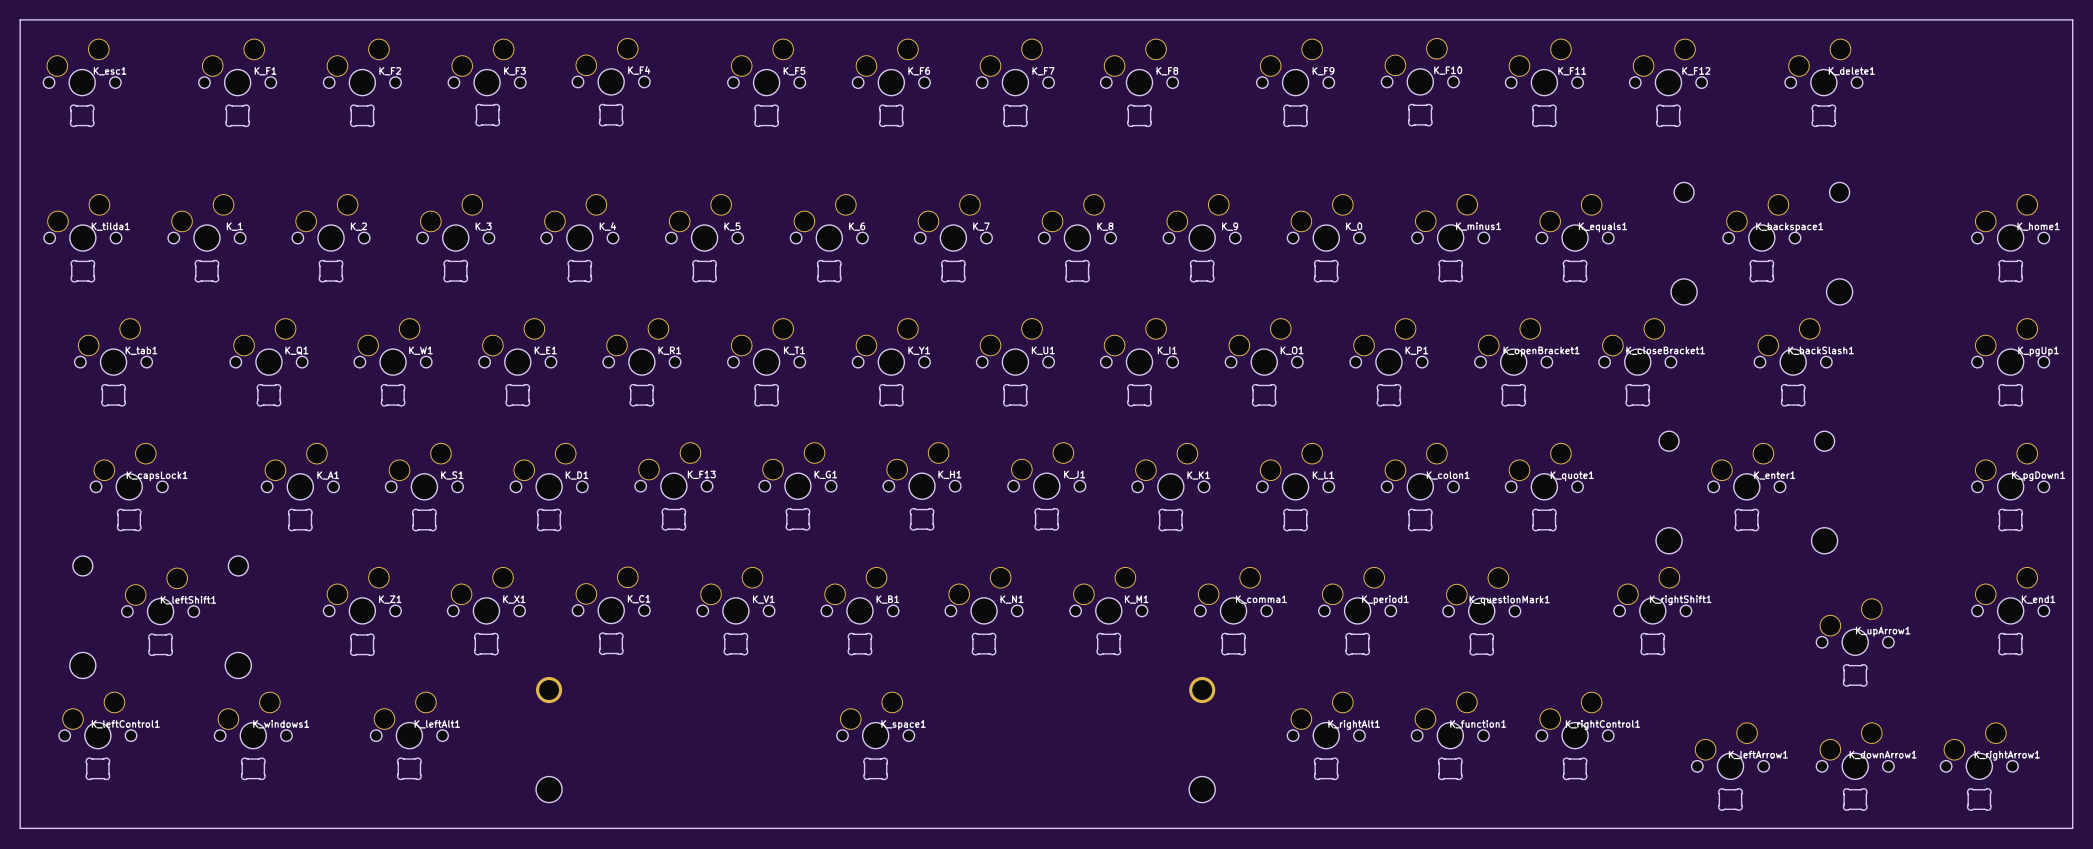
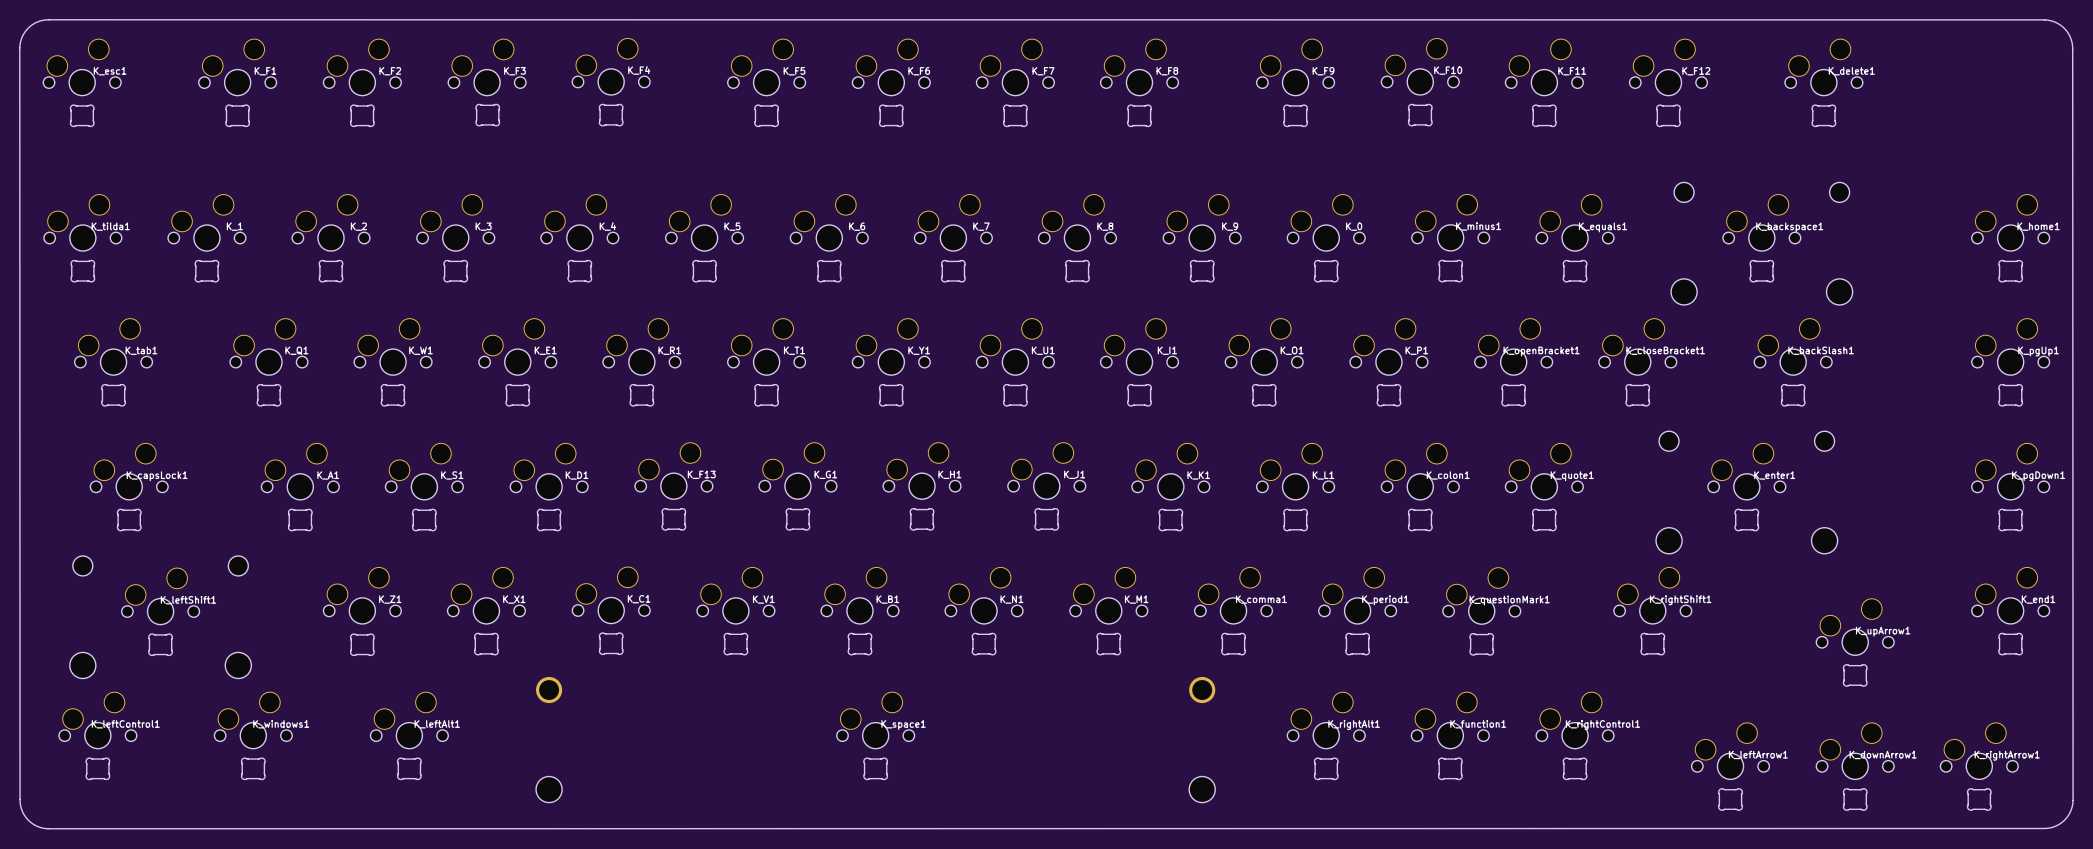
board edge: (20, 19) (20, 828) (2072, 828) (2072, 19) (20, 19) -> (49, 19) (39, 21) (28, 27) (22, 35) (19, 47) (20, 799) (24, 814) (30, 822) (38, 826) (48, 828) (2043, 828) (2053, 827) (2061, 822) (2071, 809) (2073, 800) (2072, 49) (2071, 39) (2066, 31) (2054, 21) (2044, 19) (49, 19)

